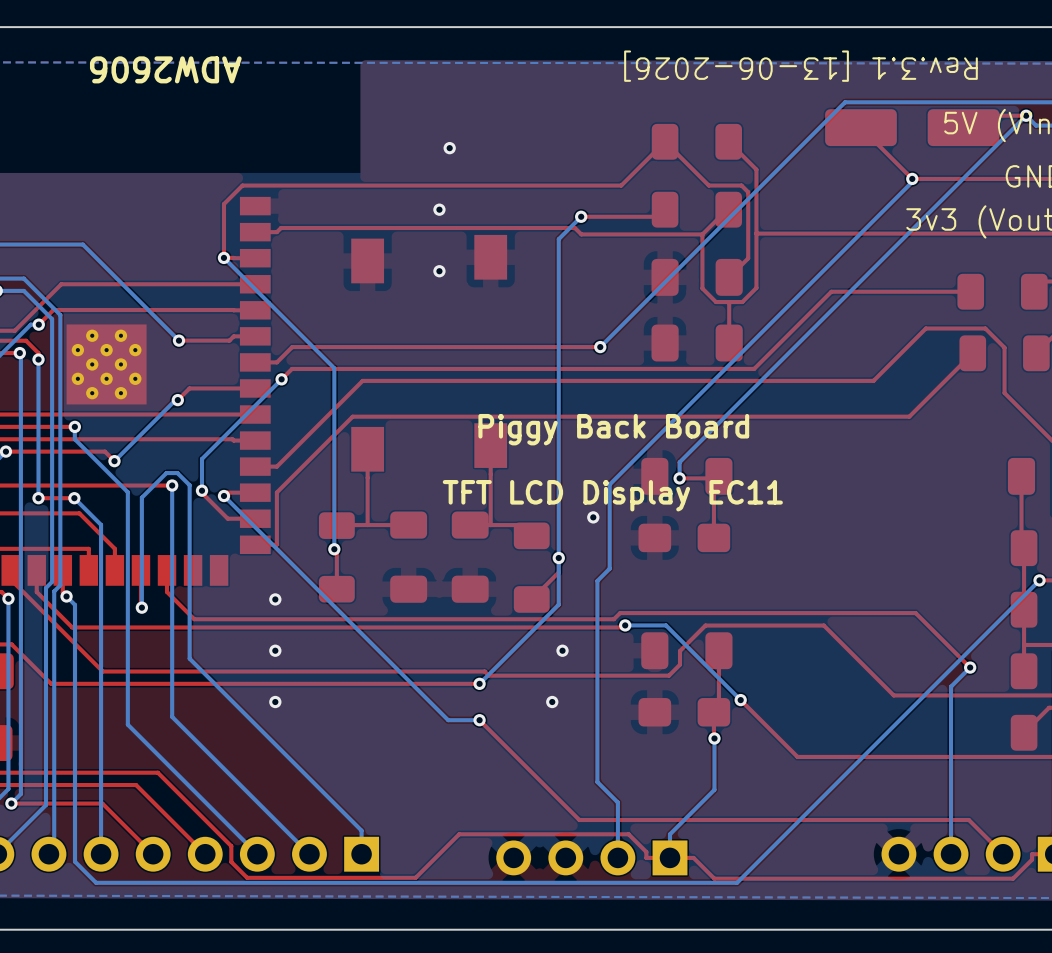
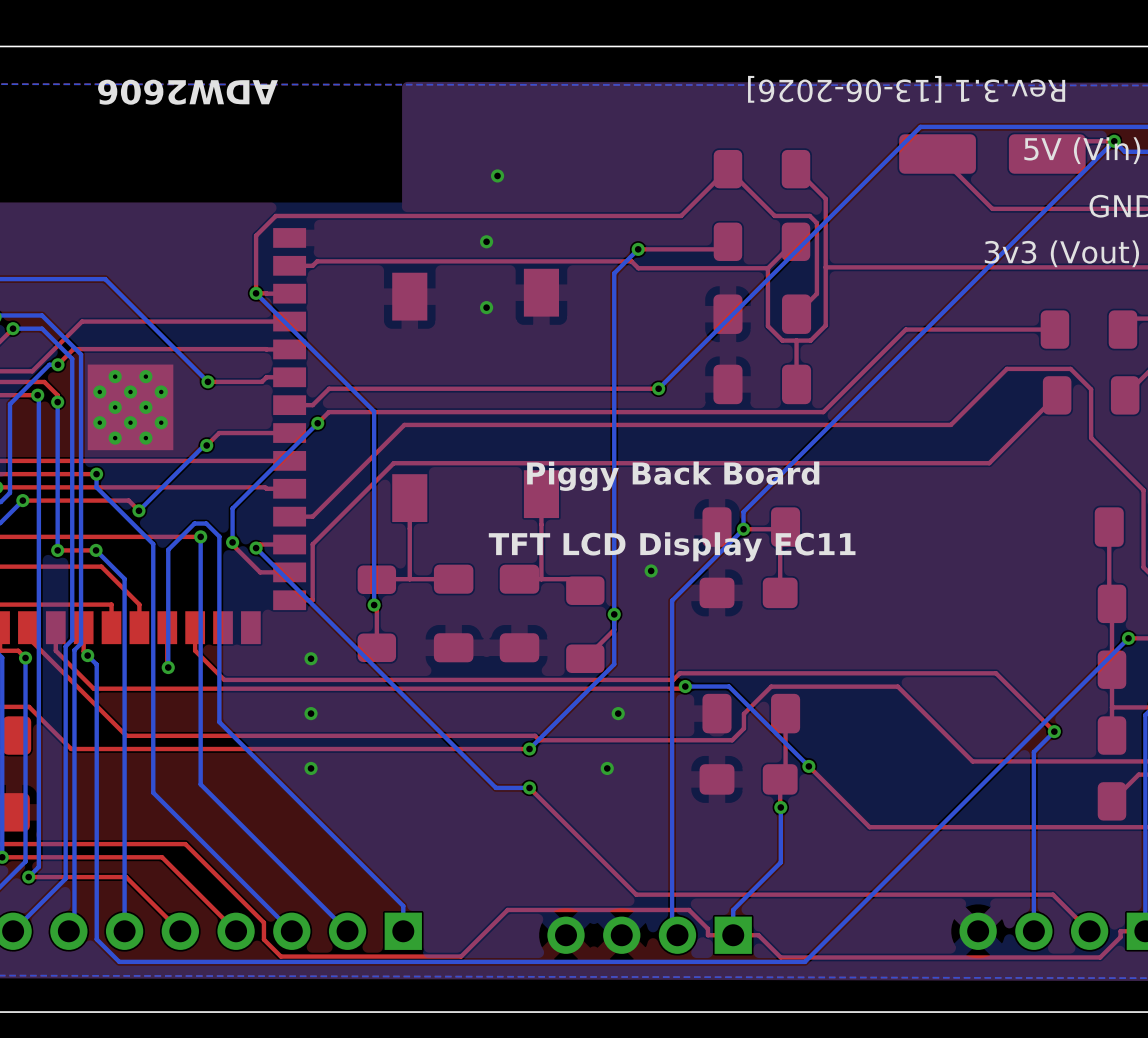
bottom track: (912, 178) (912, 181) (609, 484) (609, 568) (597, 580) (597, 782) (617, 802) (617, 857) -> (743, 529) (672, 600) (672, 929) (677, 935)
via: (912, 178) -> none

